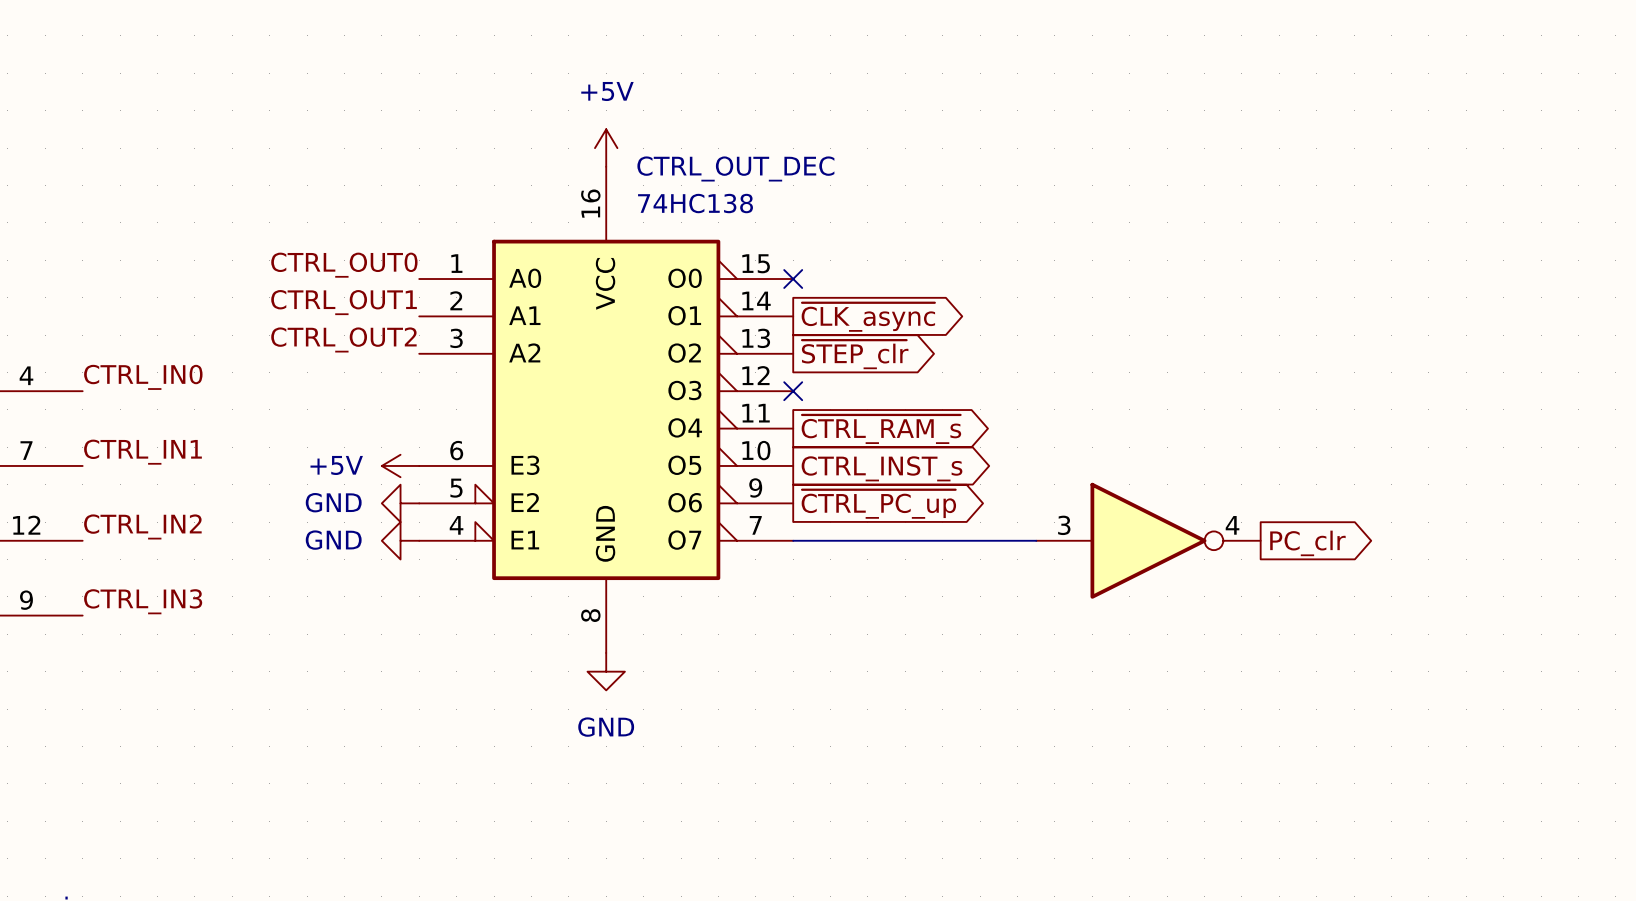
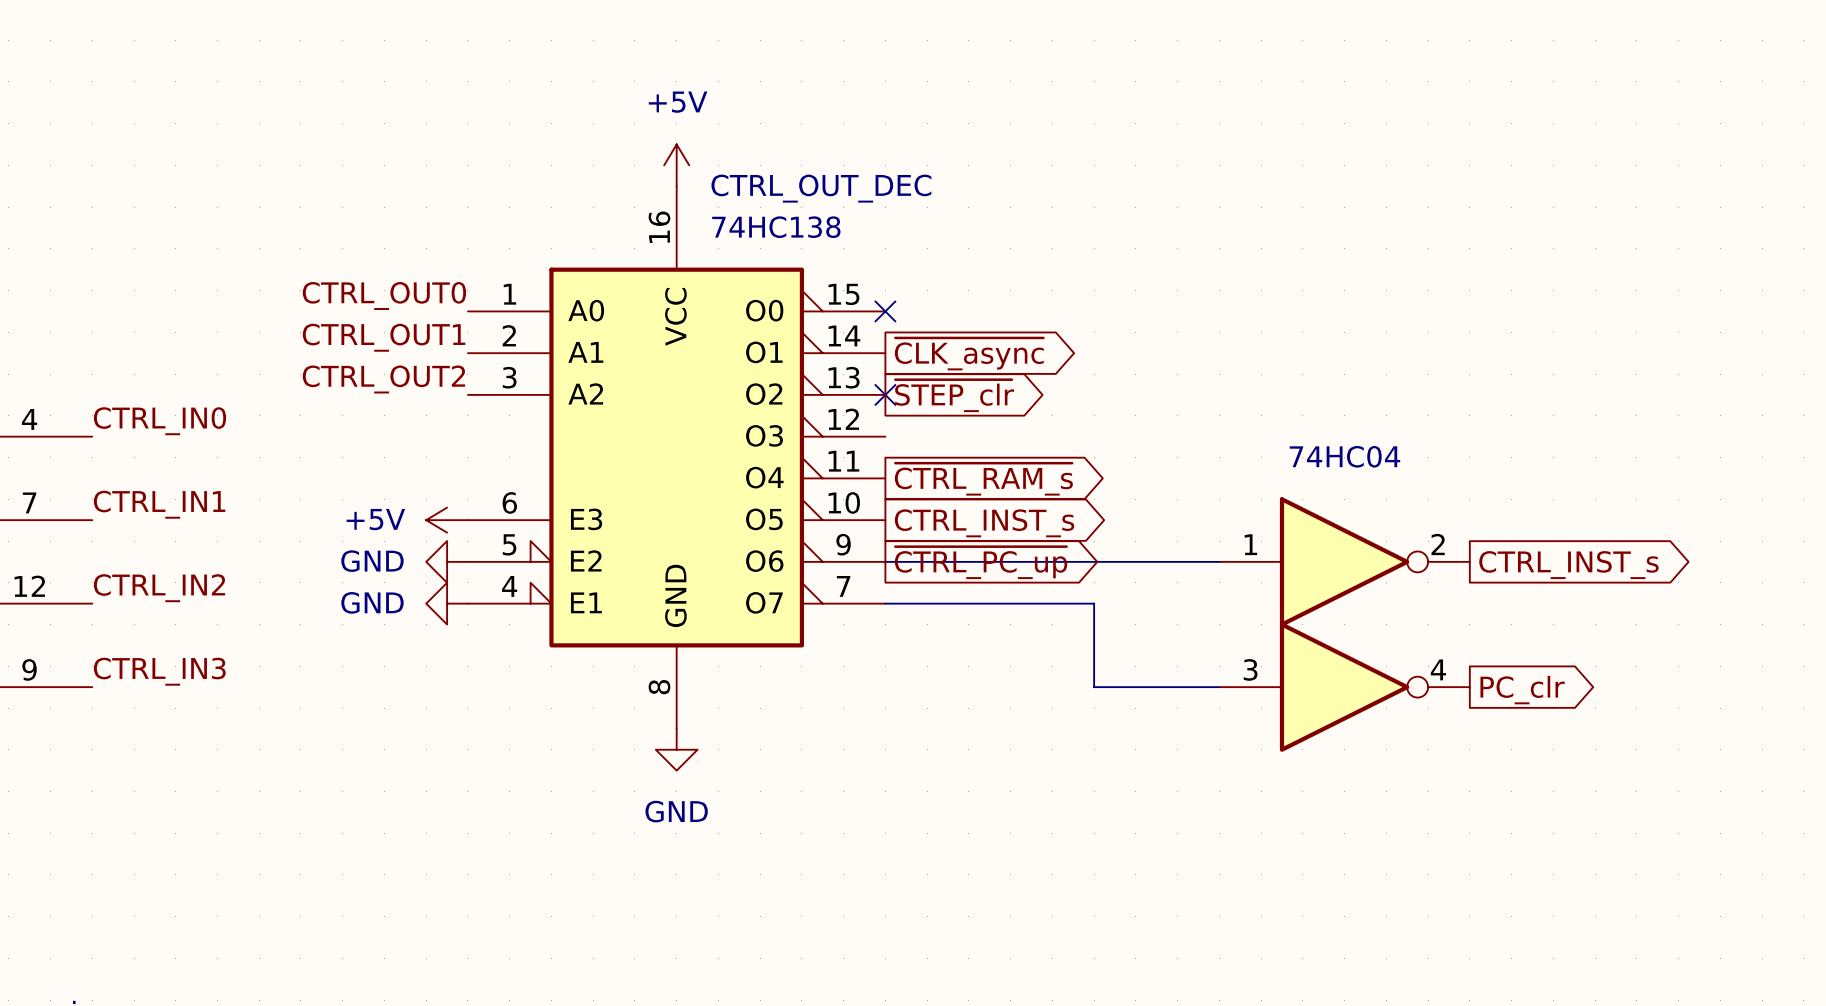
no-connect mark position: (793, 391) -> (885, 394)
wire: none -> (885, 561) (1219, 561)
part: none -> 74HC04 (1344, 561)
global label: none -> CTRL_INST_s (1568, 565)
wire: (980, 540) (1036, 540) -> (1094, 603) (1094, 687) (1219, 687)
part position: (1148, 540) -> (1344, 687)
global label position: PC_clr (1307, 543) -> PC_clr (1522, 690)

